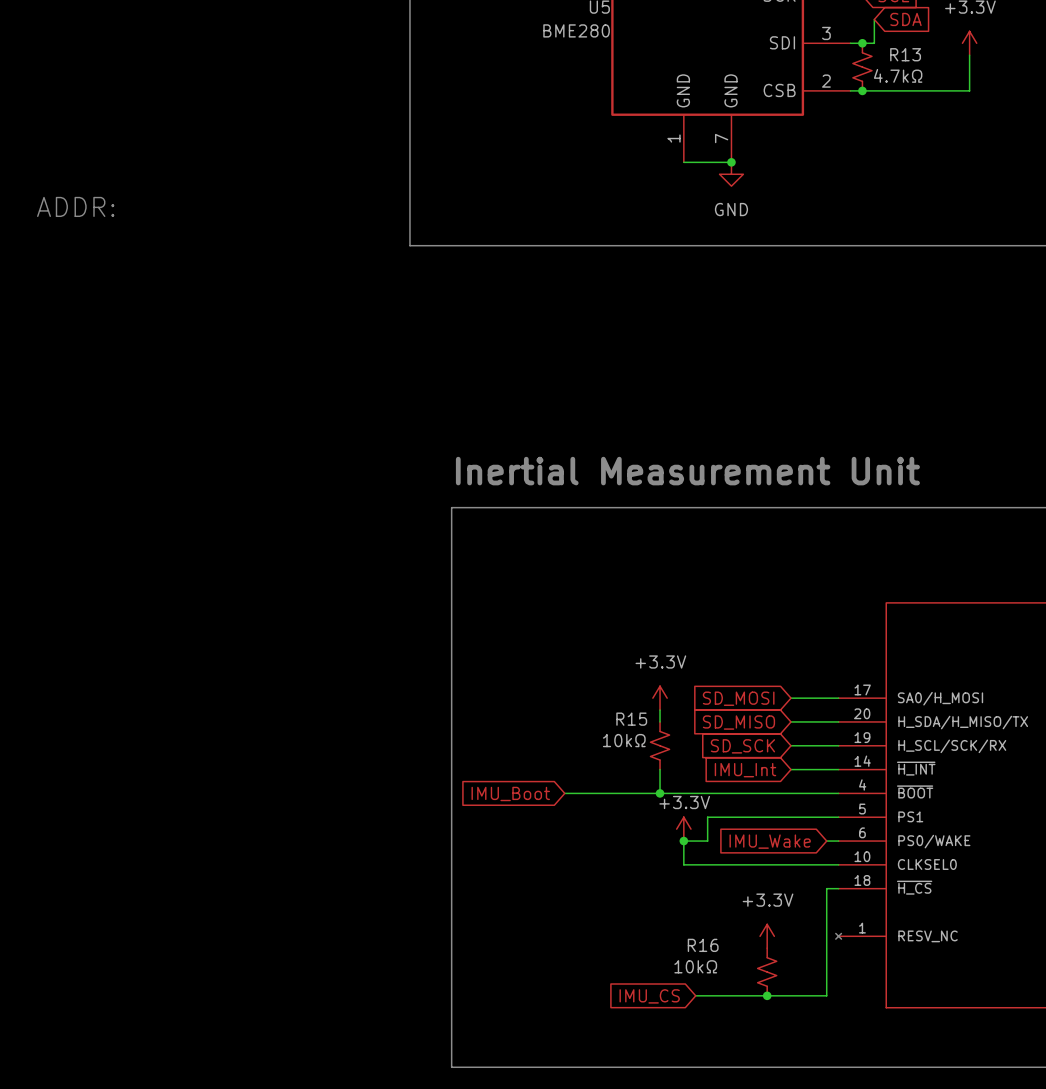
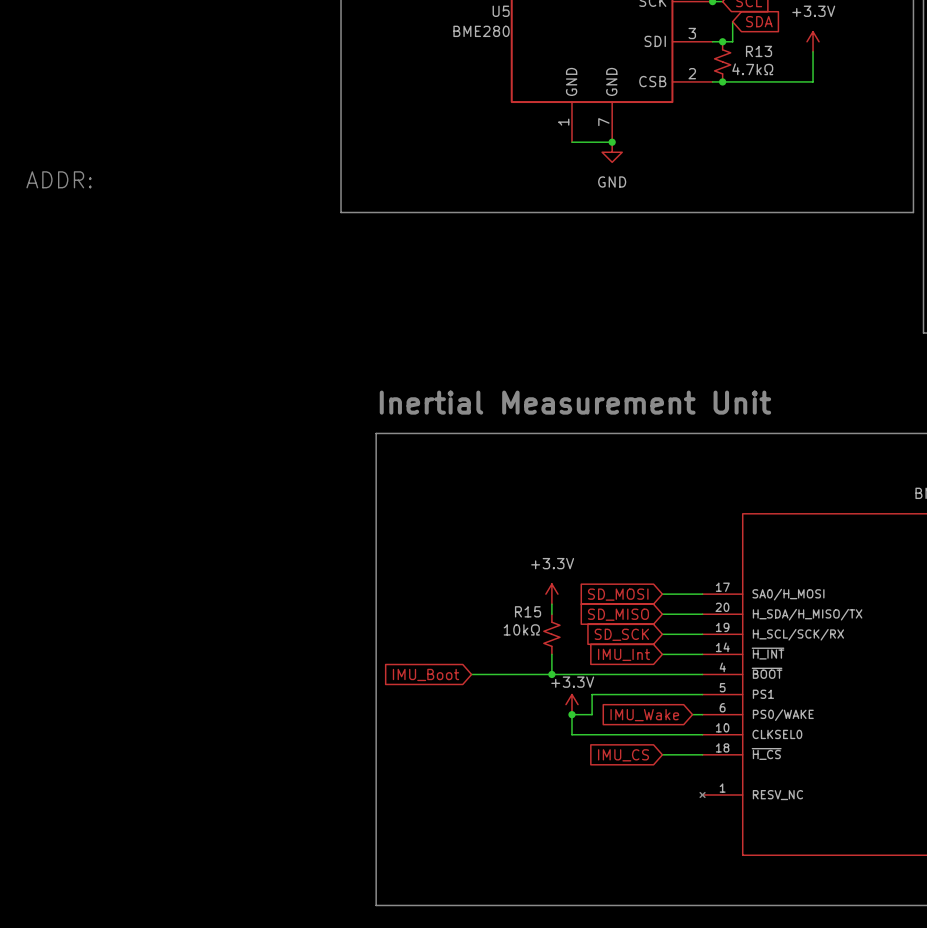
wire: (826, 888) (826, 995) (695, 995) -> (692, 754) (662, 754)
power symbol: +3.3V (767, 936) -> none
R16: 10kΩ (767, 972) -> none
junction: (767, 995) -> none
global label position: IMU_CS (649, 996) -> IMU_CS (623, 755)

